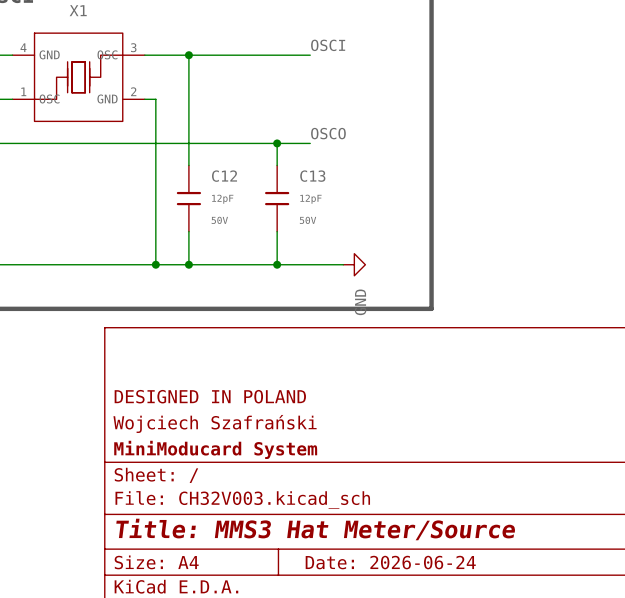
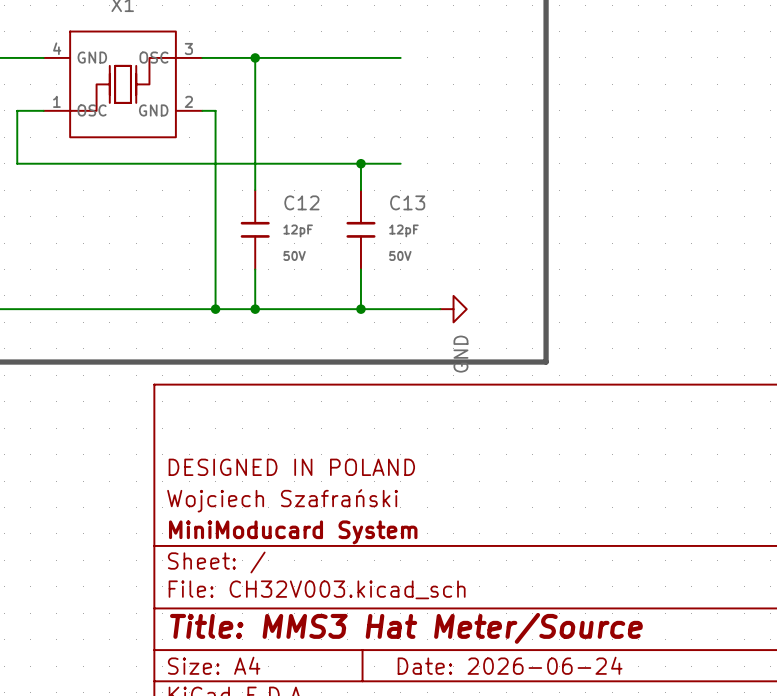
label: OSCI (328, 45) -> none
label: OSCO (328, 133) -> none

